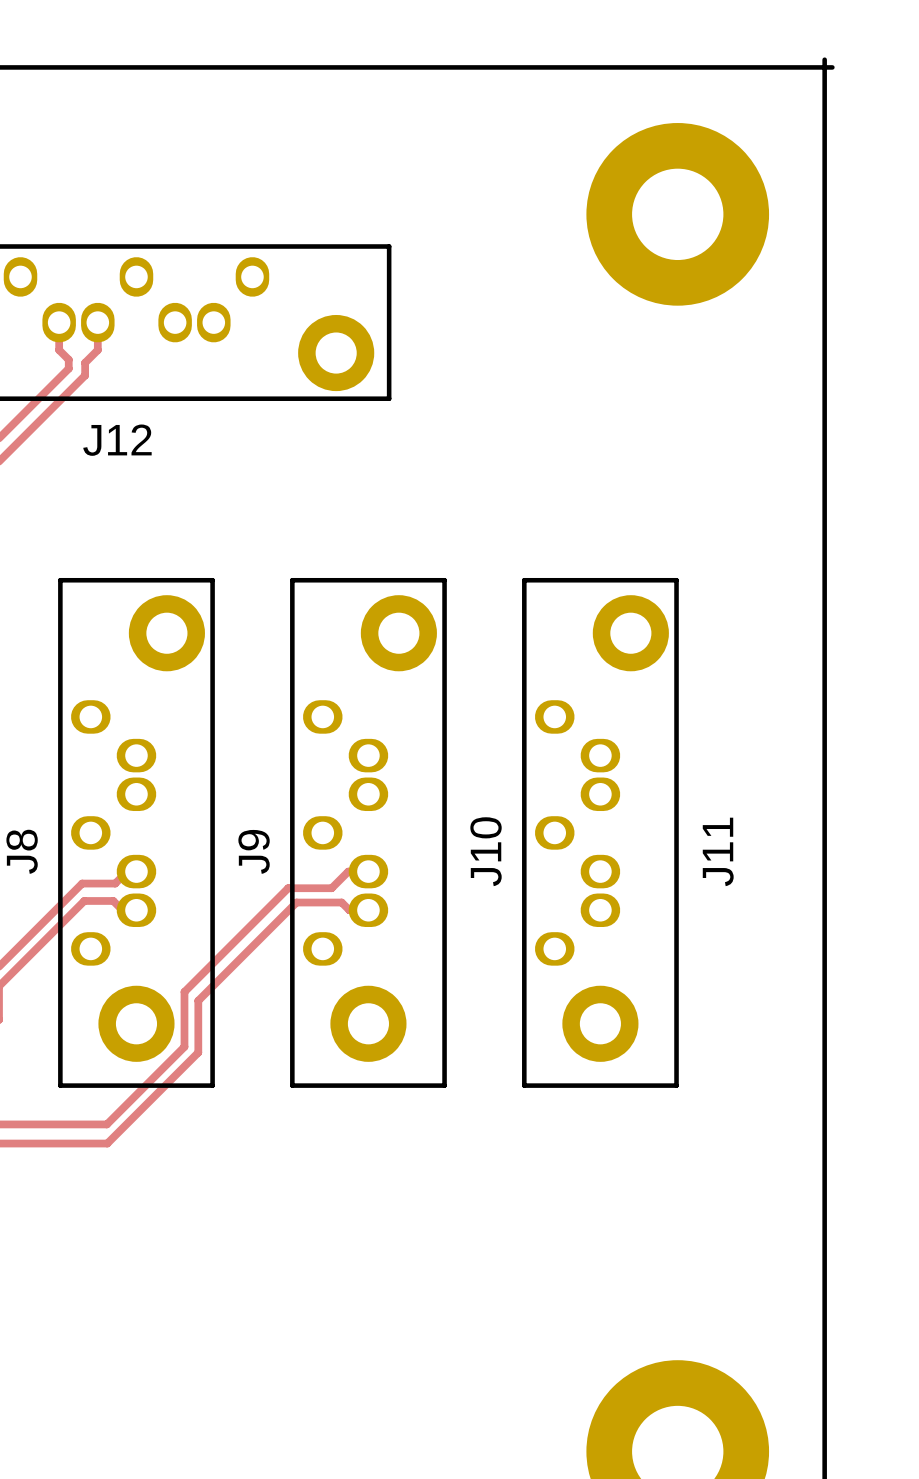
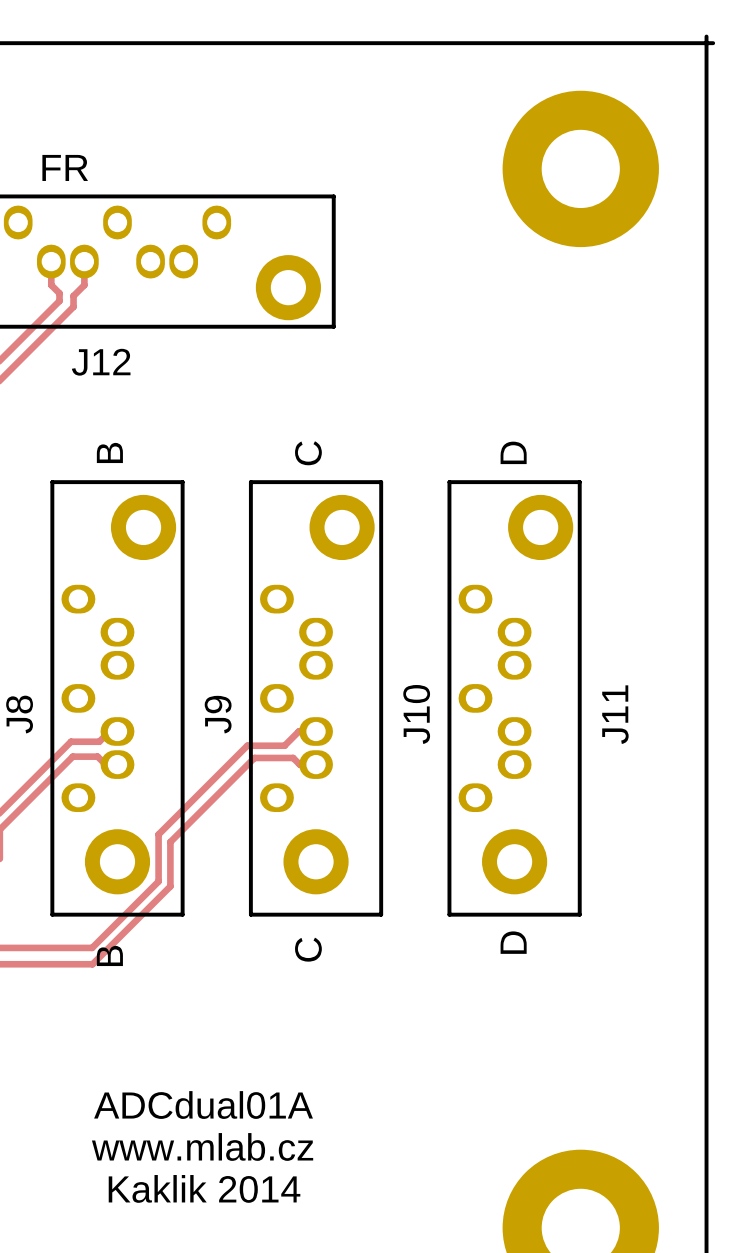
text: none -> FR (65, 167)
text: none -> B (109, 452)
text: none -> C (308, 453)
text: none -> D (513, 452)
text: none -> D (513, 942)
text: none -> C (308, 949)
text: none -> B (109, 955)
text: none -> ADCdual01A (203, 1105)
text: none -> www.mlab.cz (202, 1146)
text: none -> Kaklik 2014 (204, 1188)

